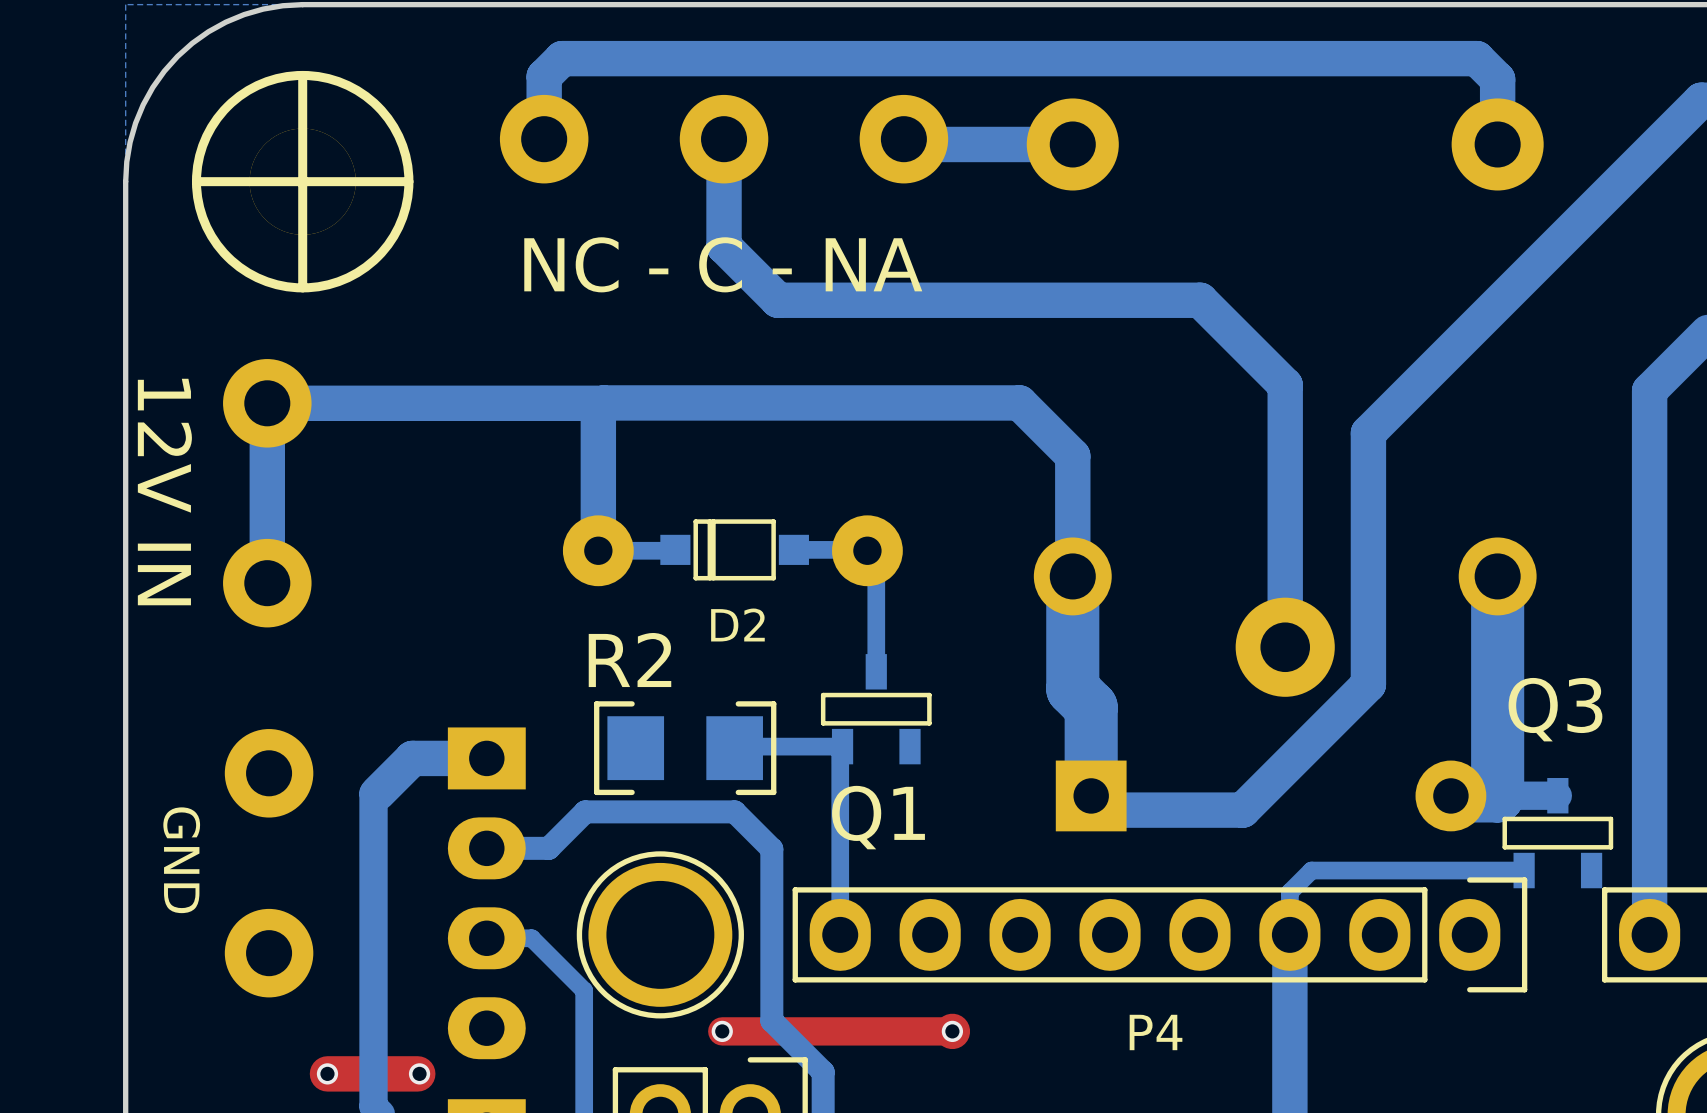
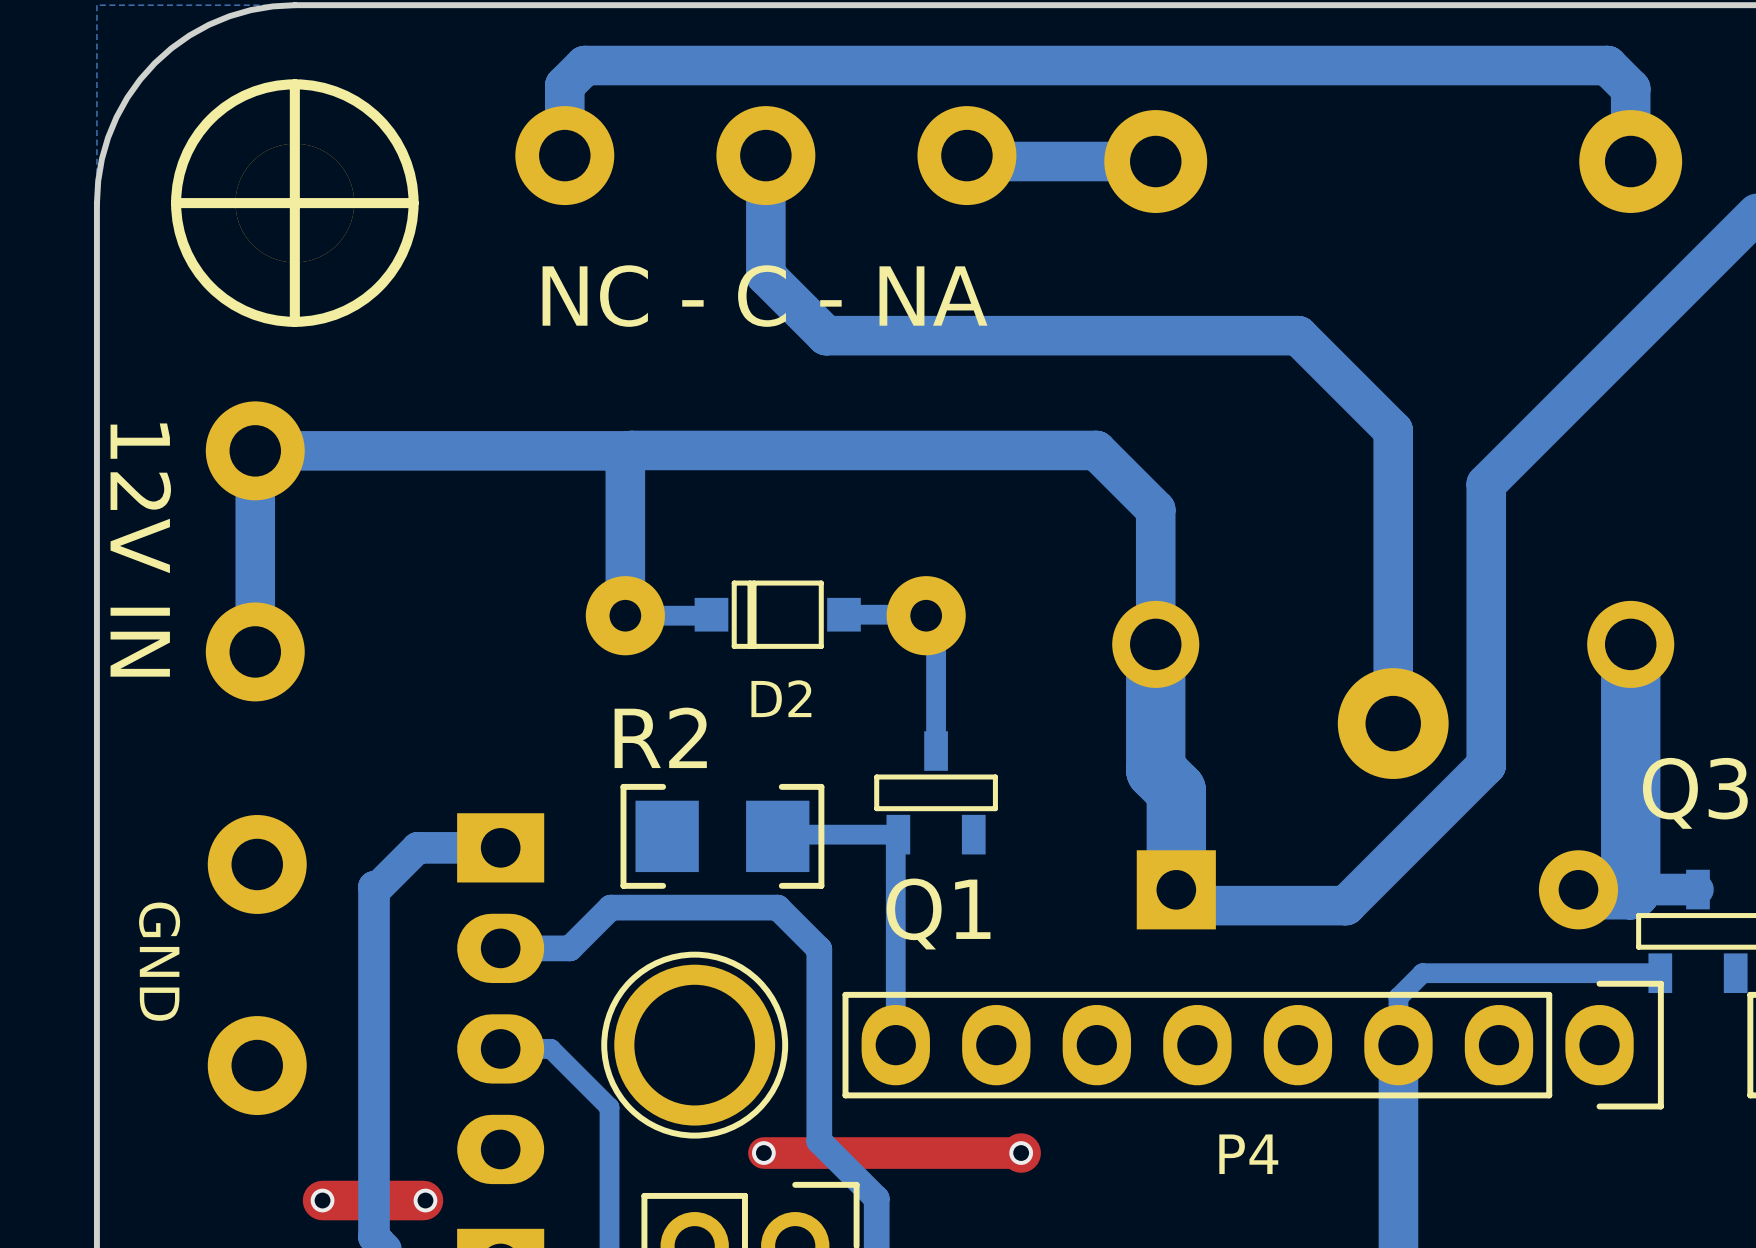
bottom track width: thick (486, 758) (412, 758) (377, 793) -> thin (500, 847) (417, 847) (378, 886)

